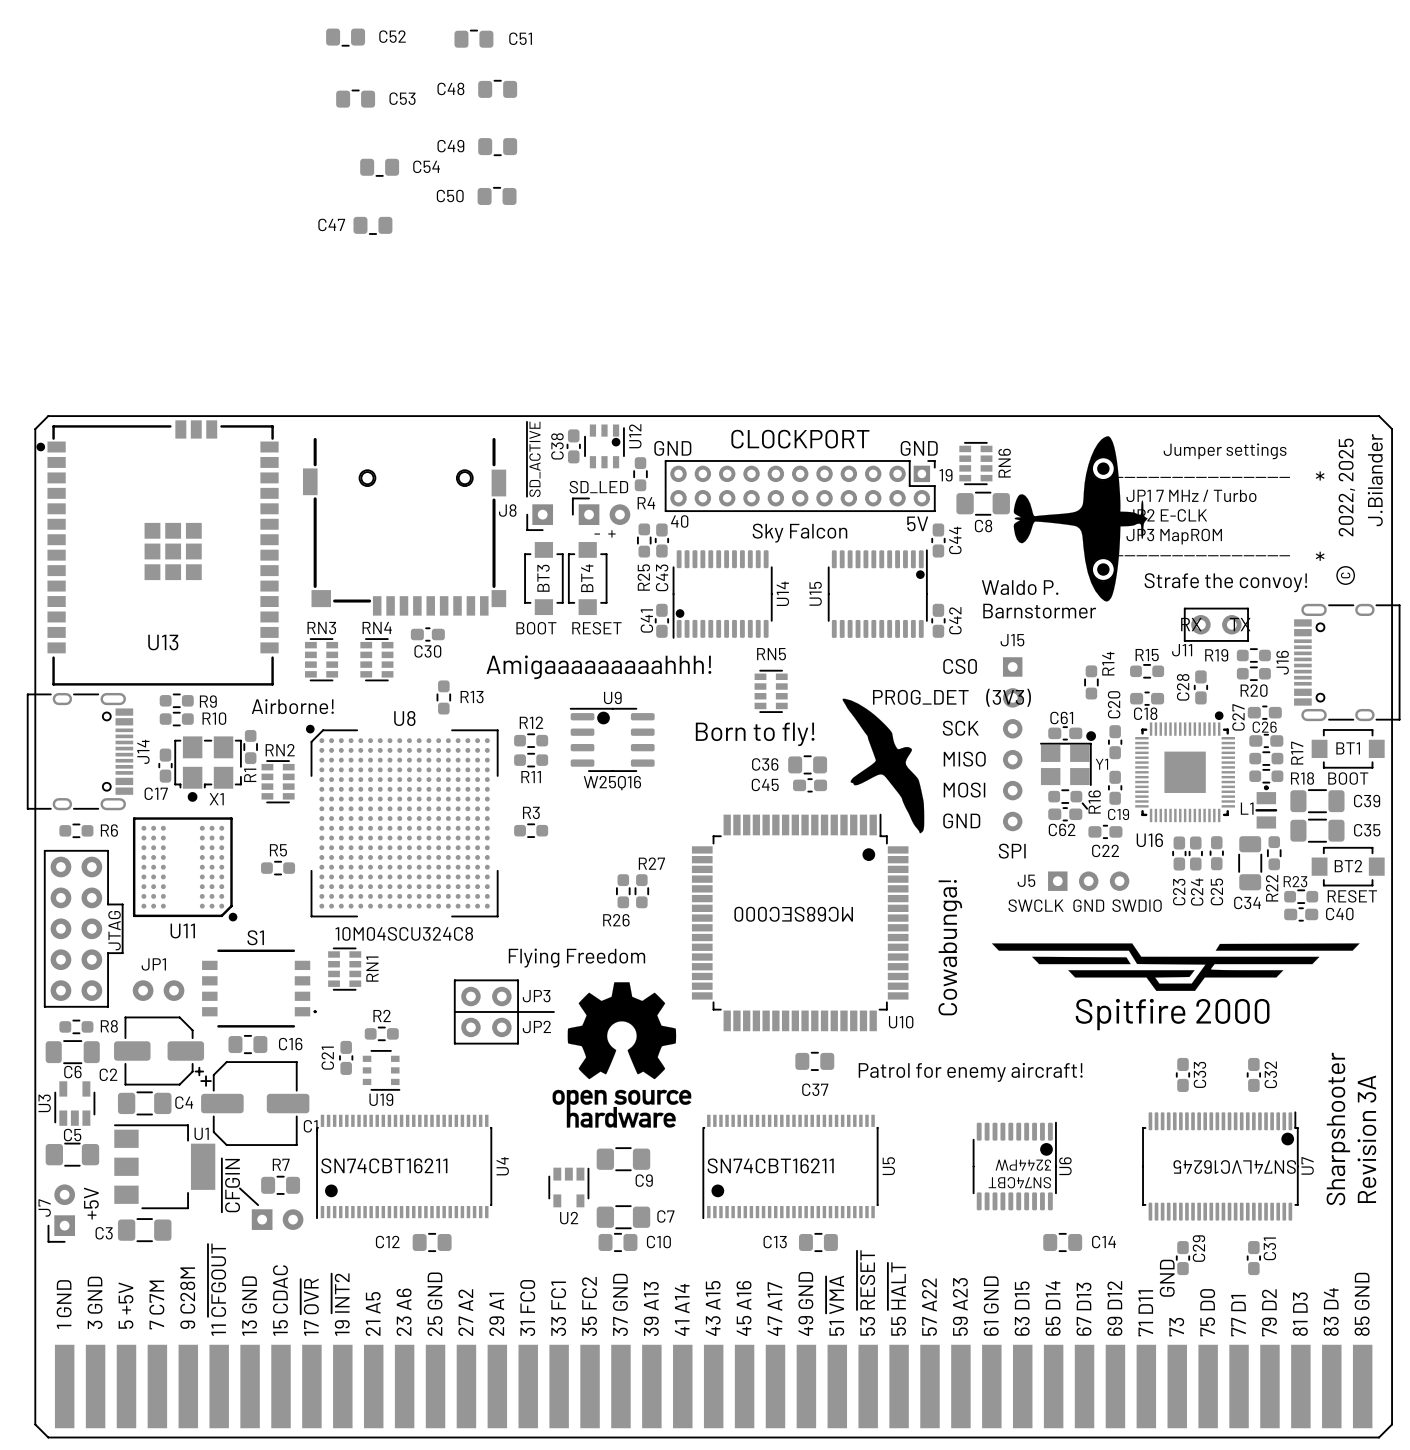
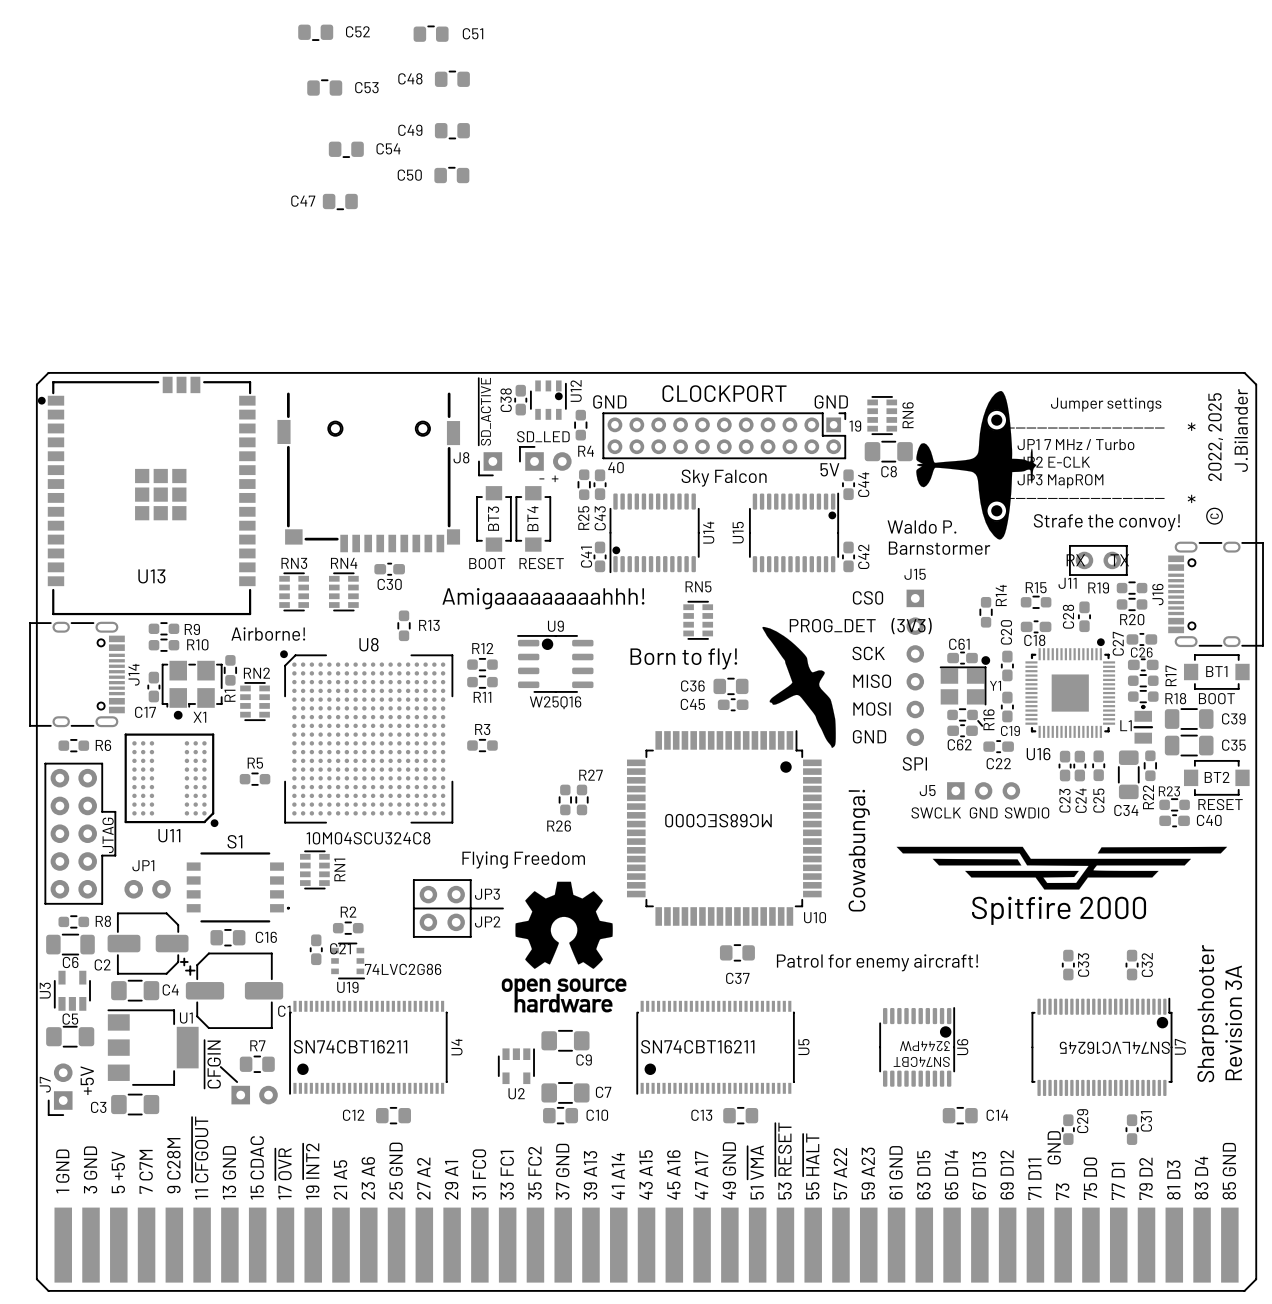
C21 name rotation: 0° (327, 1058) -> 90° clockwise (340, 948)
C21 name position: C21 (327, 1058) -> C21 (340, 948)
text: none -> 74LVC2G86 (403, 969)

